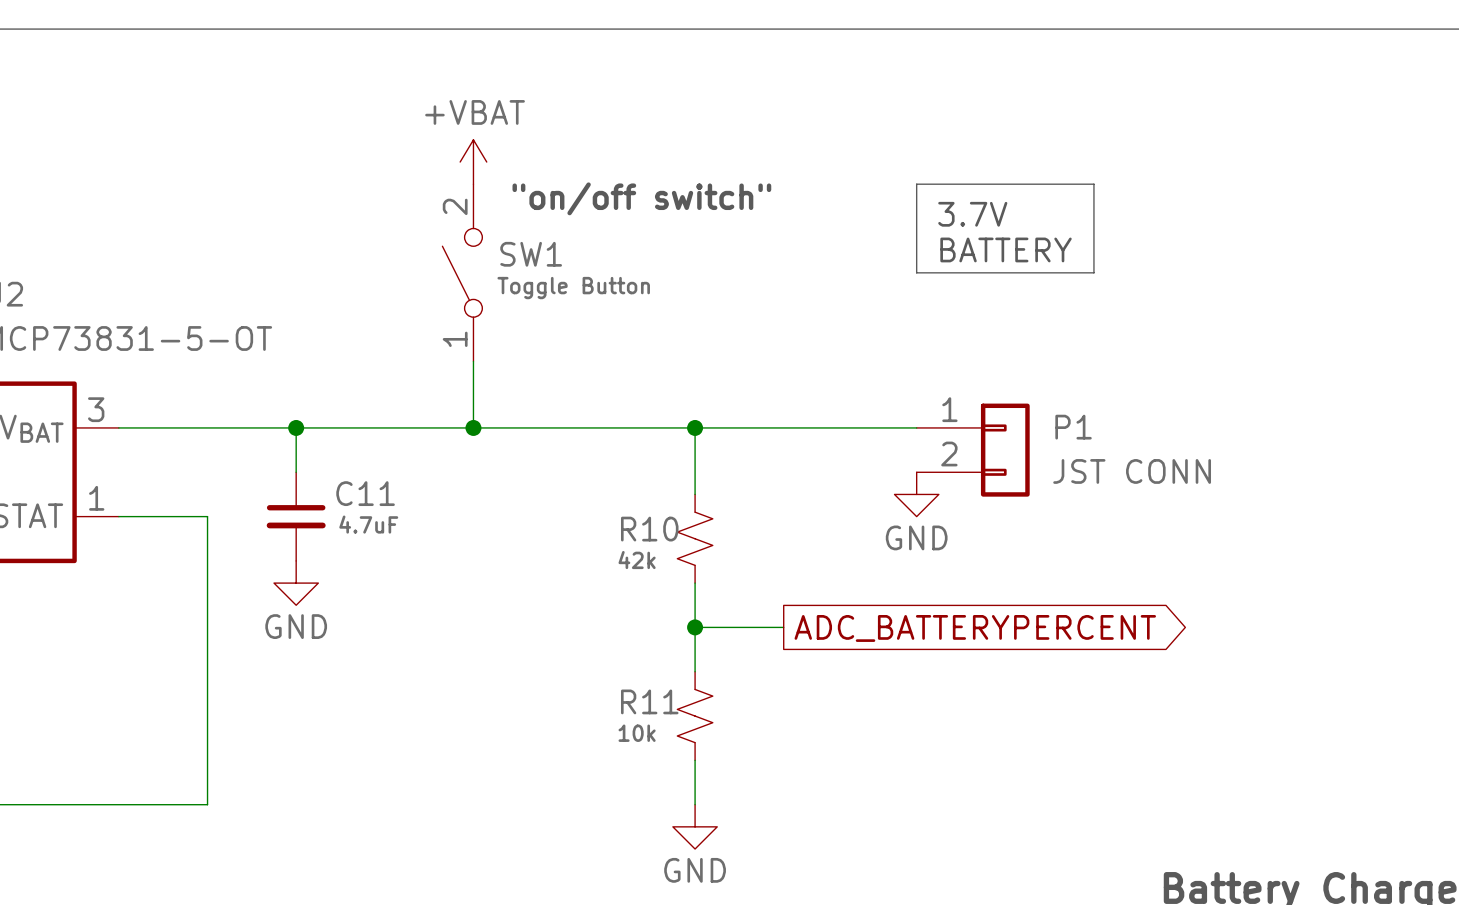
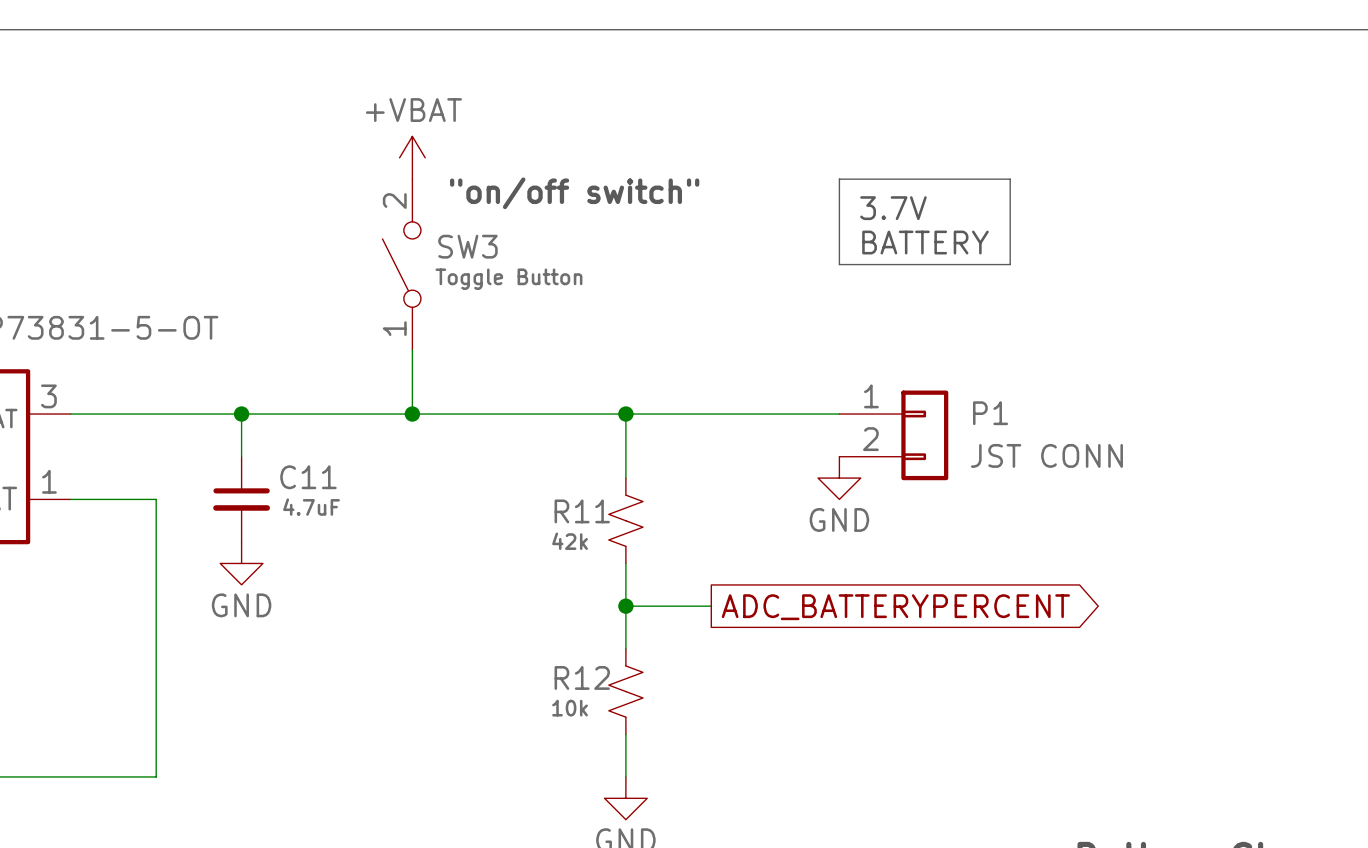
SW1 name: SW1 (531, 254) -> SW3 (467, 246)
R10 name: R10 (649, 529) -> R11 (582, 511)
R11 name: R11 (649, 701) -> R12 (582, 677)

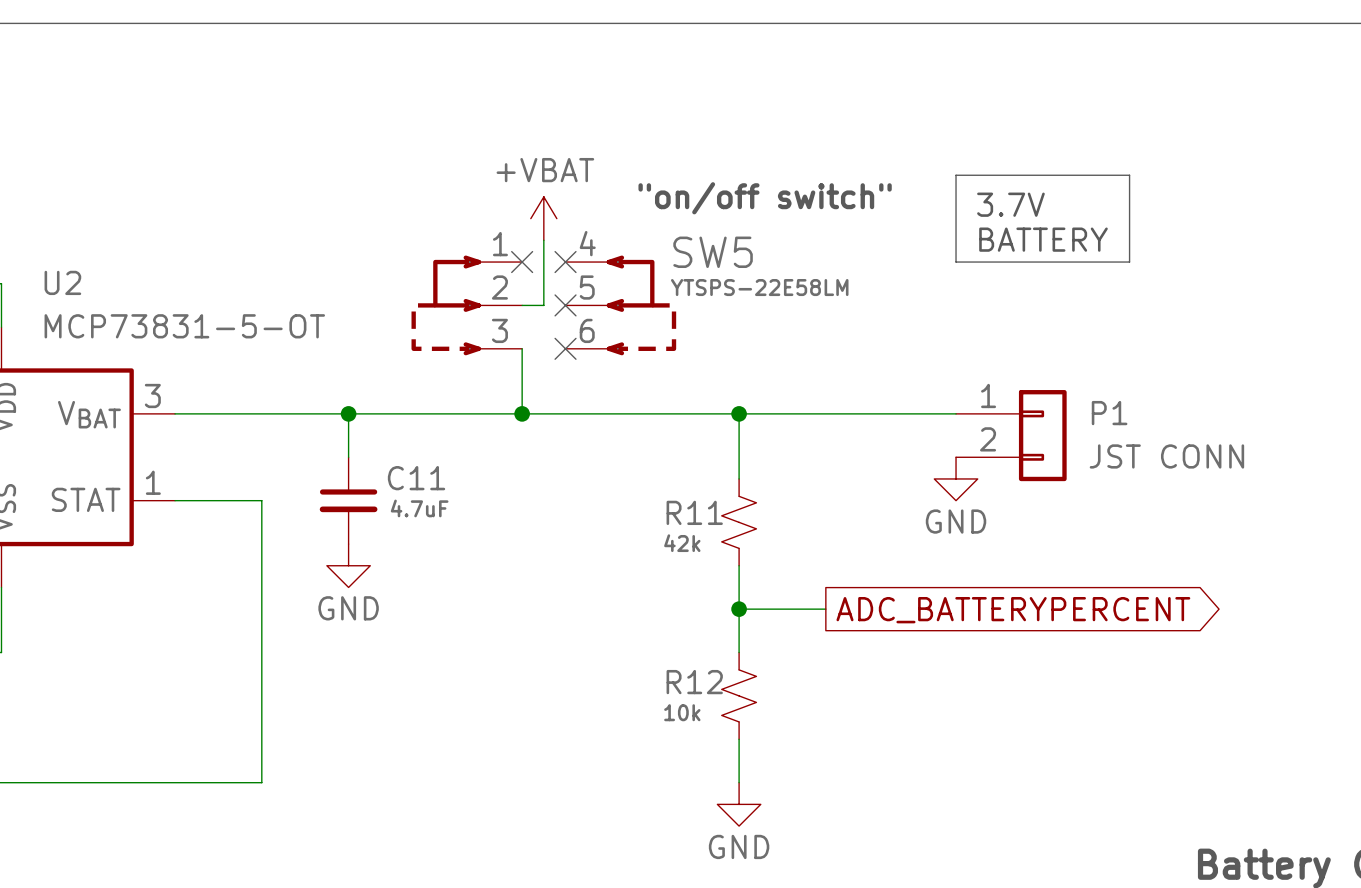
power symbol position: +VBAT (412, 157) -> +VBAT (543, 218)
text position: "on/off switch" (574, 193) -> "on/off switch" (765, 198)
wire: none -> (543, 240) (543, 305) (522, 305)
SW3: Toggle Button (401, 264) -> none
no-connect mark: none -> (522, 262)
no-connect mark: none -> (565, 262)
SW5: none -> YTSPS-22E58LM (543, 305)
no-connect mark: none -> (565, 305)
no-connect mark: none -> (565, 348)

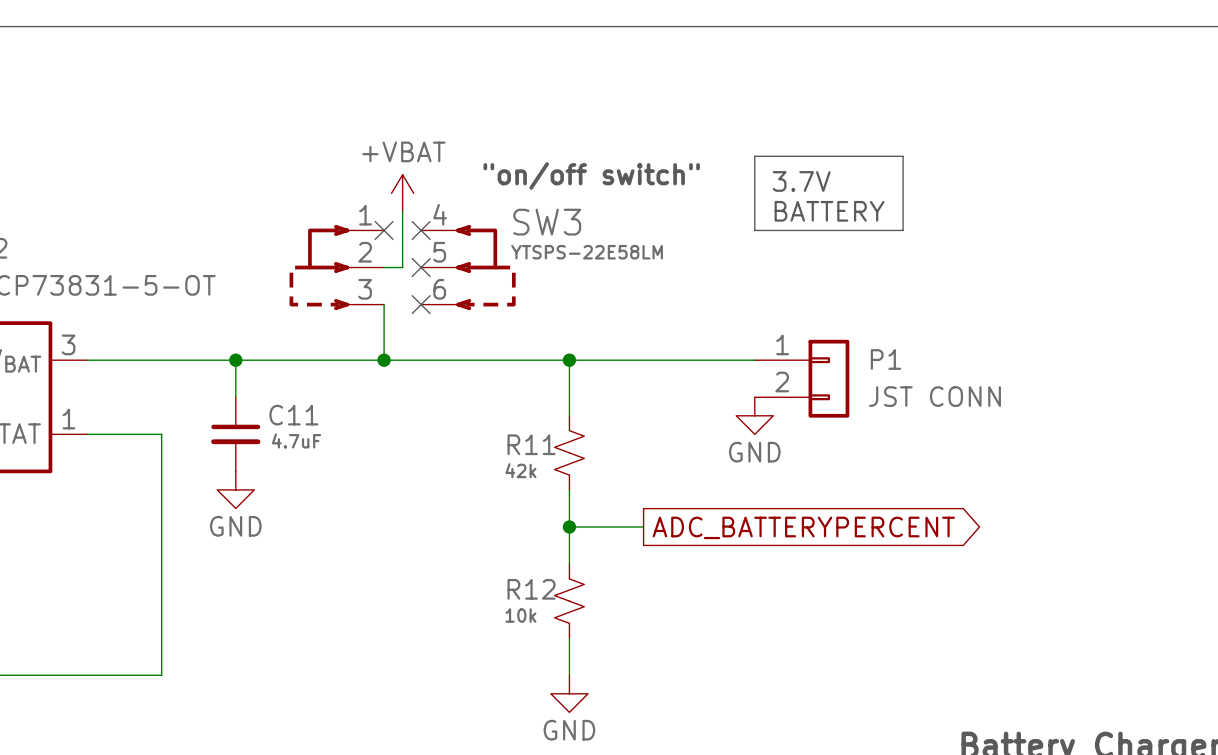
SW5 name: SW5 (713, 252) -> SW3 (547, 222)

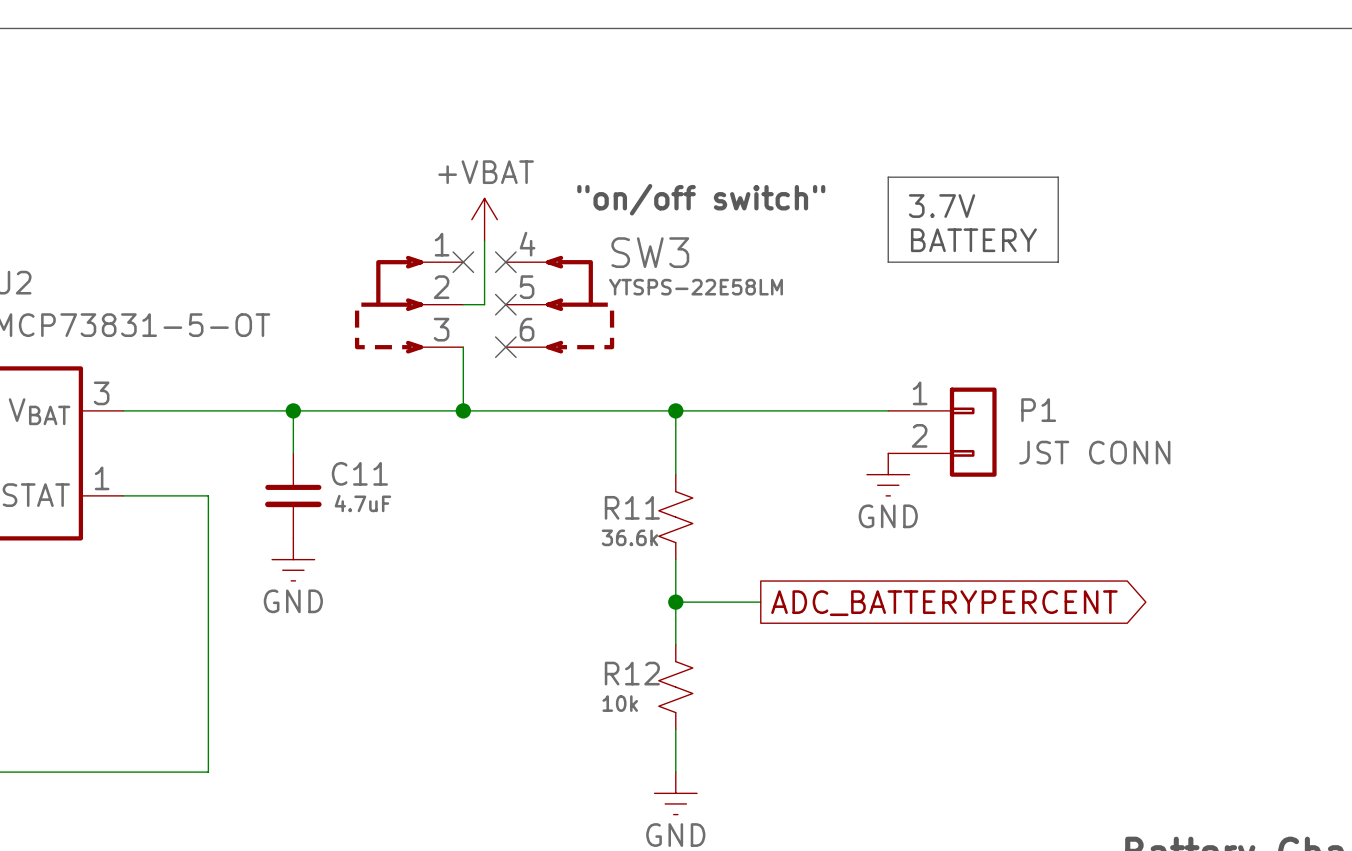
power symbol shape: [736, 397, 774, 435] -> [867, 453, 910, 496]
R11 value: 42k (520, 470) -> 36.6k (629, 537)
power symbol shape: [217, 471, 255, 509] -> [272, 538, 315, 581]
power symbol shape: [550, 675, 588, 713] -> [654, 772, 698, 815]

